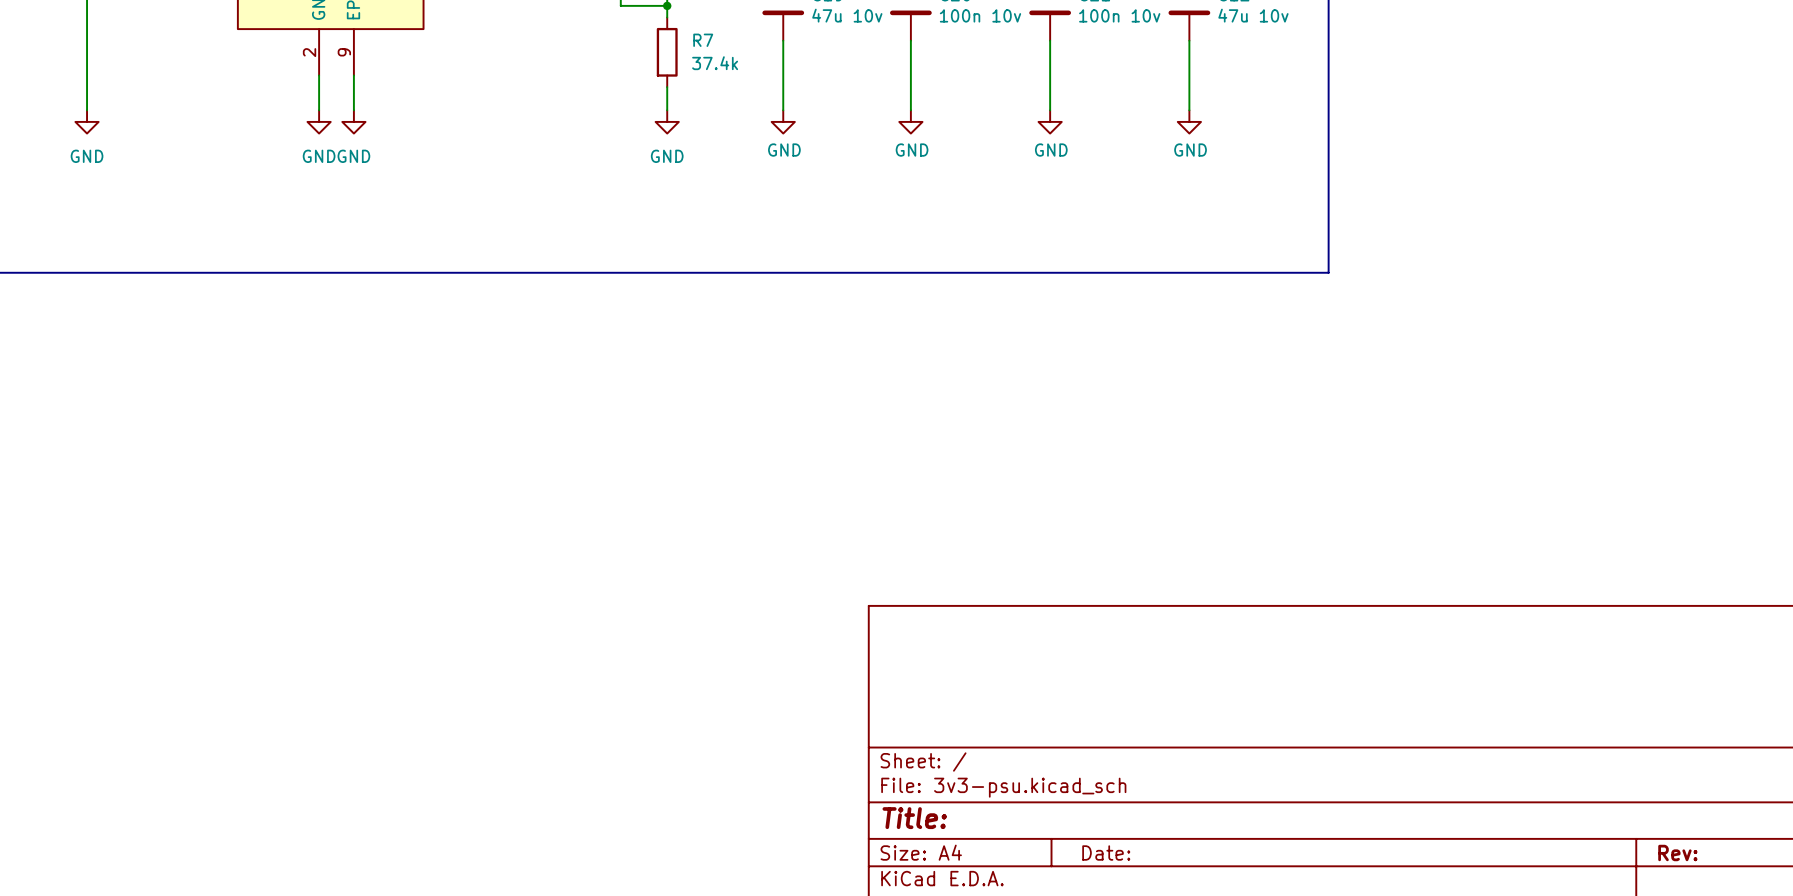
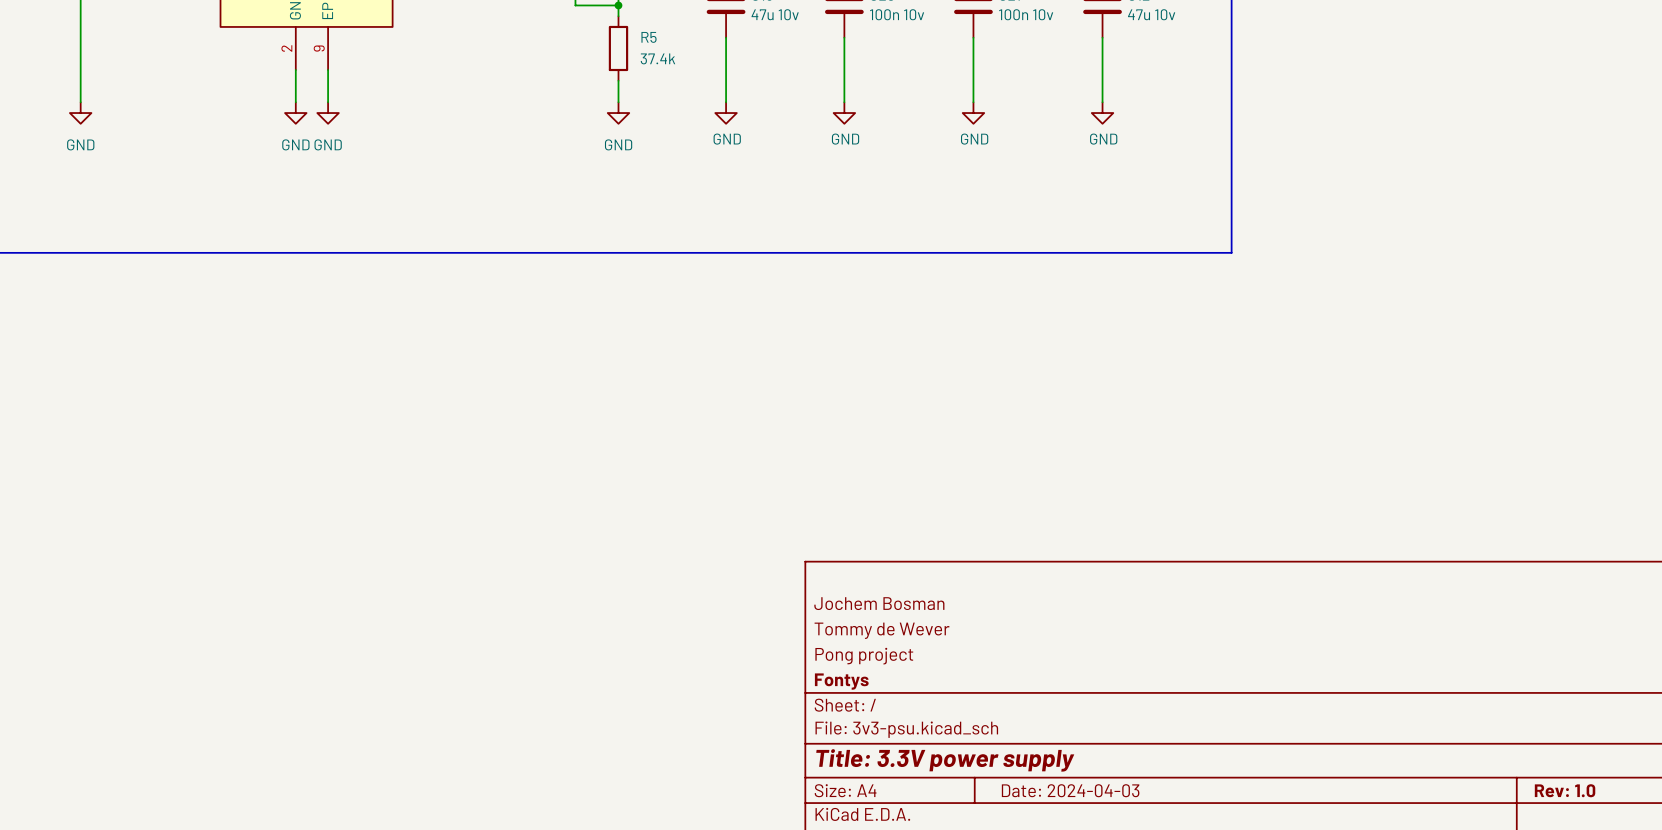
R7 name: R7 (703, 40) -> R5 (649, 37)
title block: none -> Jochem Bosman (879, 603)
title block: none -> Tommy de Wever (882, 630)
title block: none -> Pong project (864, 656)
title block: none -> Fontys (841, 681)
title block: Title: (914, 818) -> Title: 3.3V power supply (945, 760)
title block: Date: (1106, 852) -> Date: 2024-04-03 (1070, 790)
title block: Rev: (1677, 852) -> Rev: 1.0 (1565, 790)

